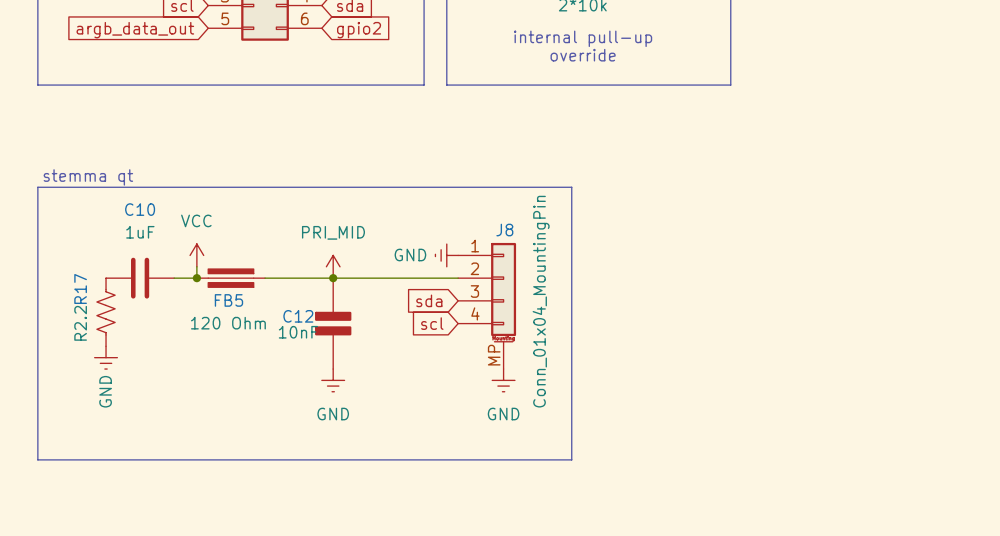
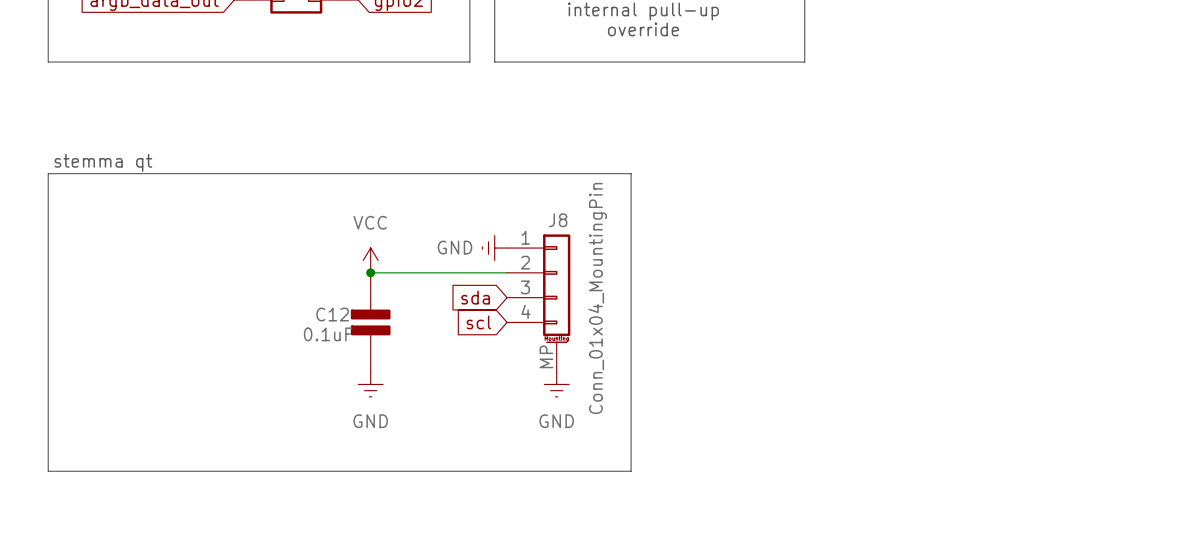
power symbol: VCC (196, 255) -> none
wire: (196, 266) (196, 278) (174, 278) -> none
power symbol: PRI_MID (333, 266) -> VCC (370, 260)
C10: 1uF (140, 278) -> none
junction: (196, 278) -> none
FB5: 120 Ohm (230, 278) -> none
wire: (265, 278) (333, 278) -> none
R17: R2.2 (106, 312) -> none
C12 value: 10nF (298, 332) -> 0.1uF (328, 334)
power symbol: GND (106, 357) -> none

